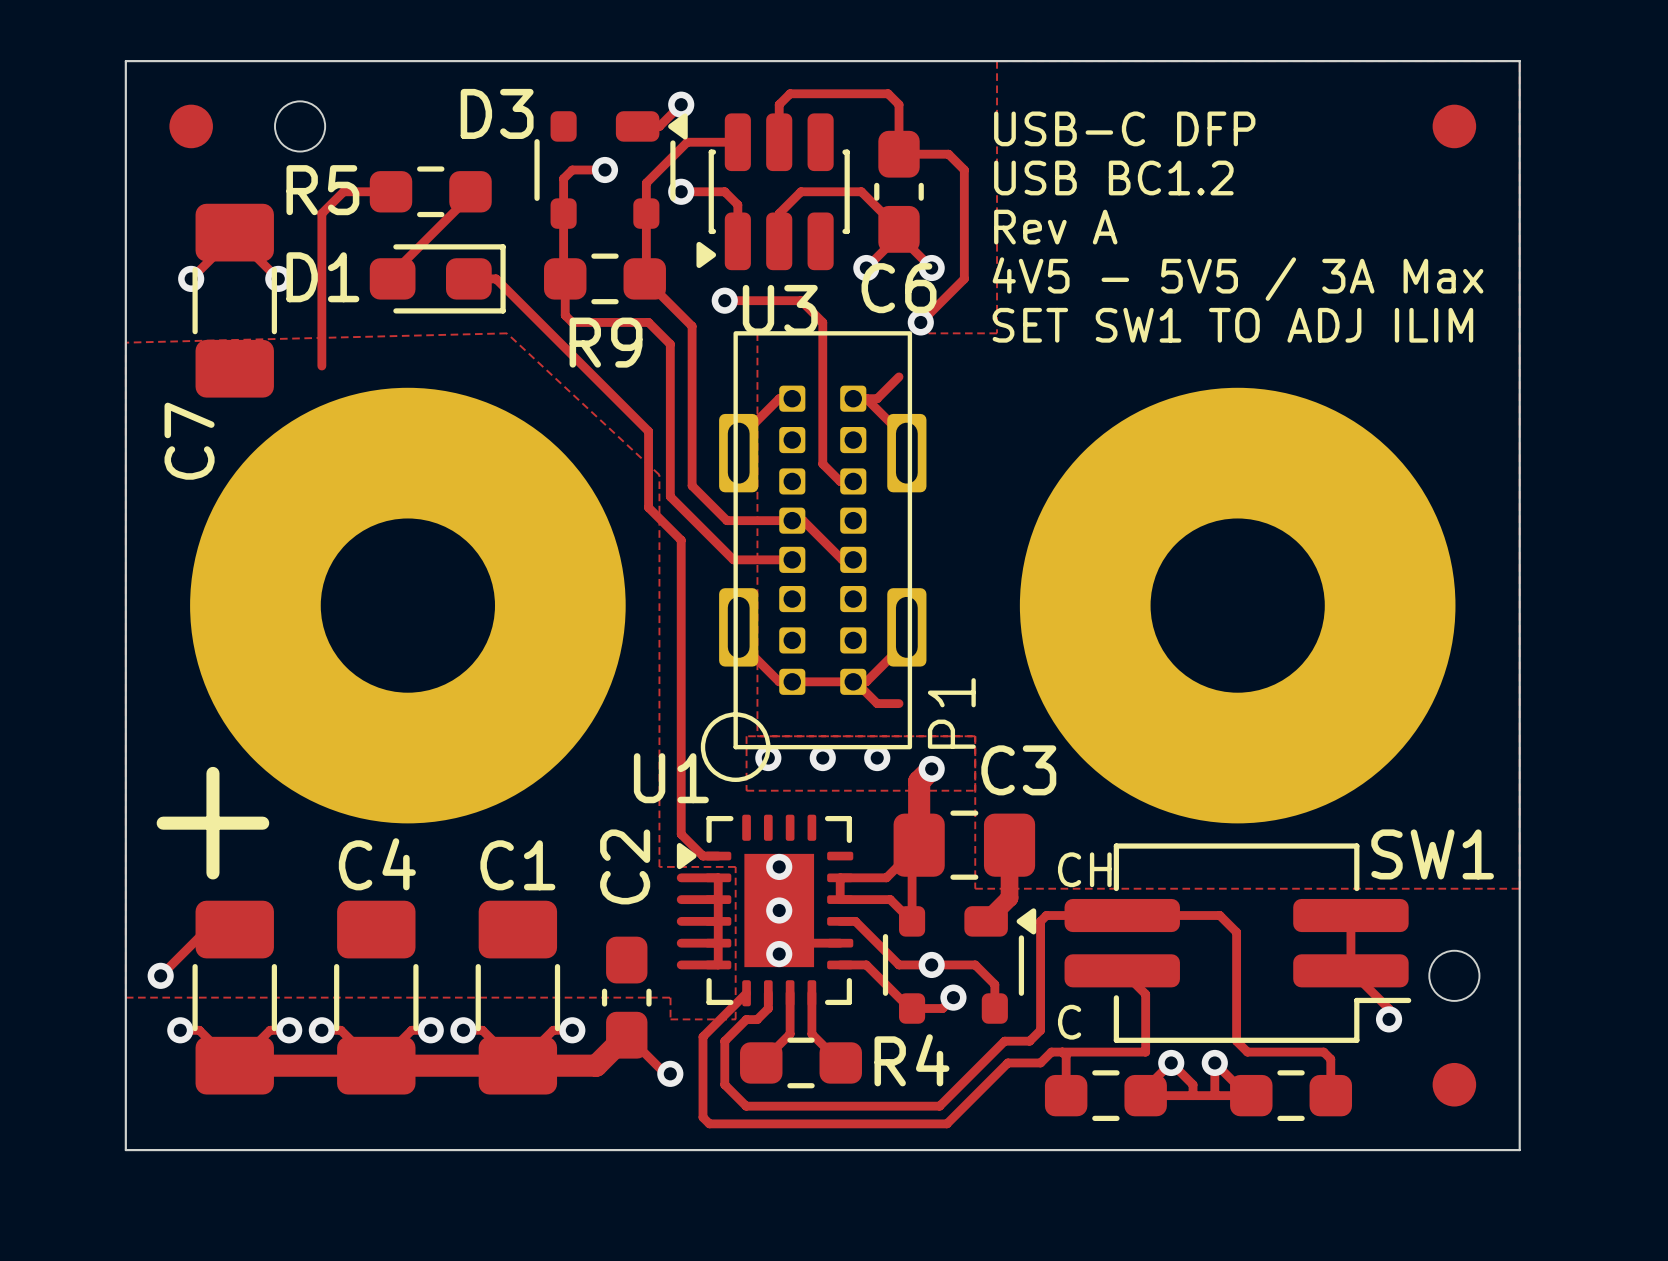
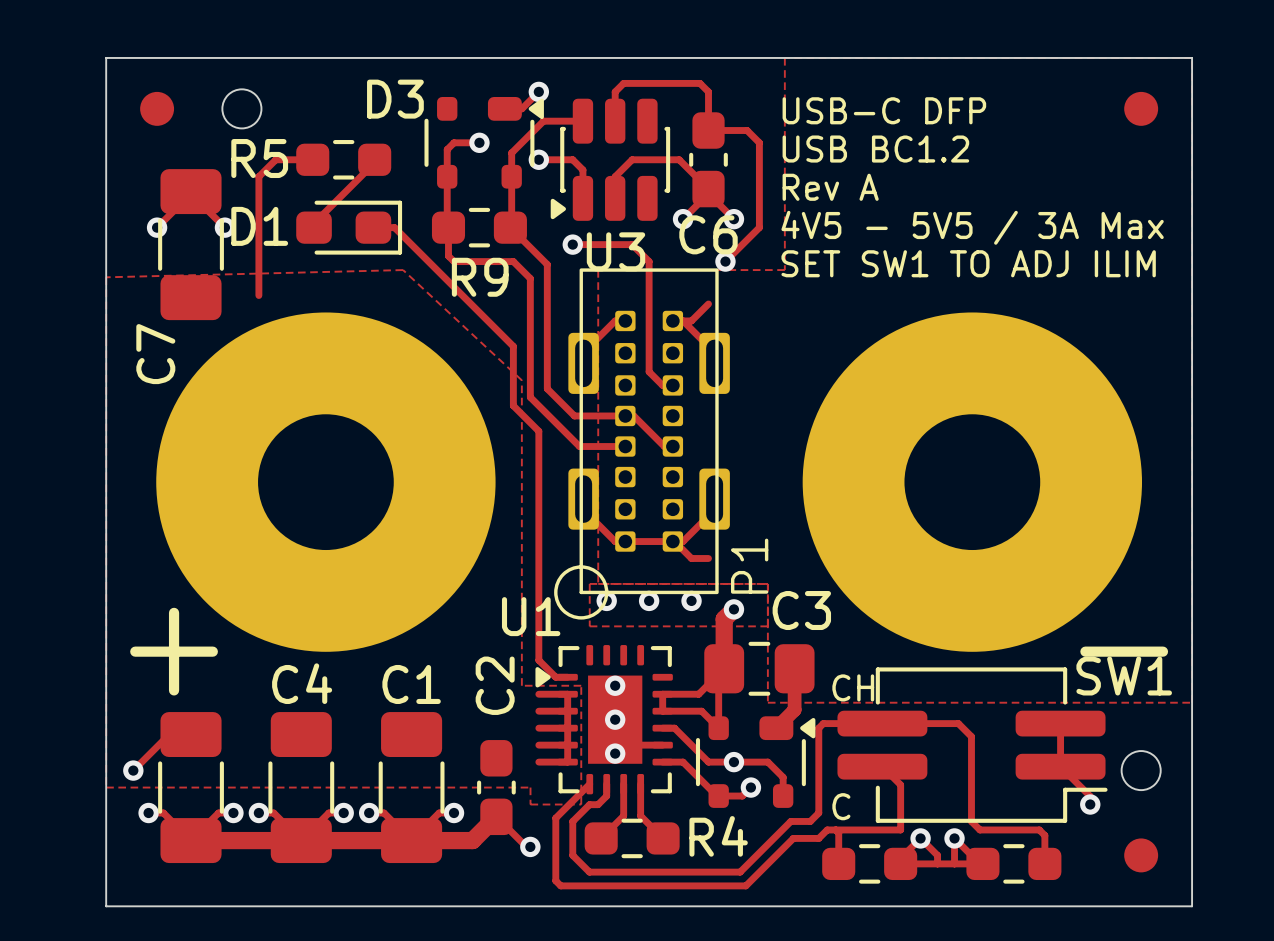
text: none -> - (1124, 651)

